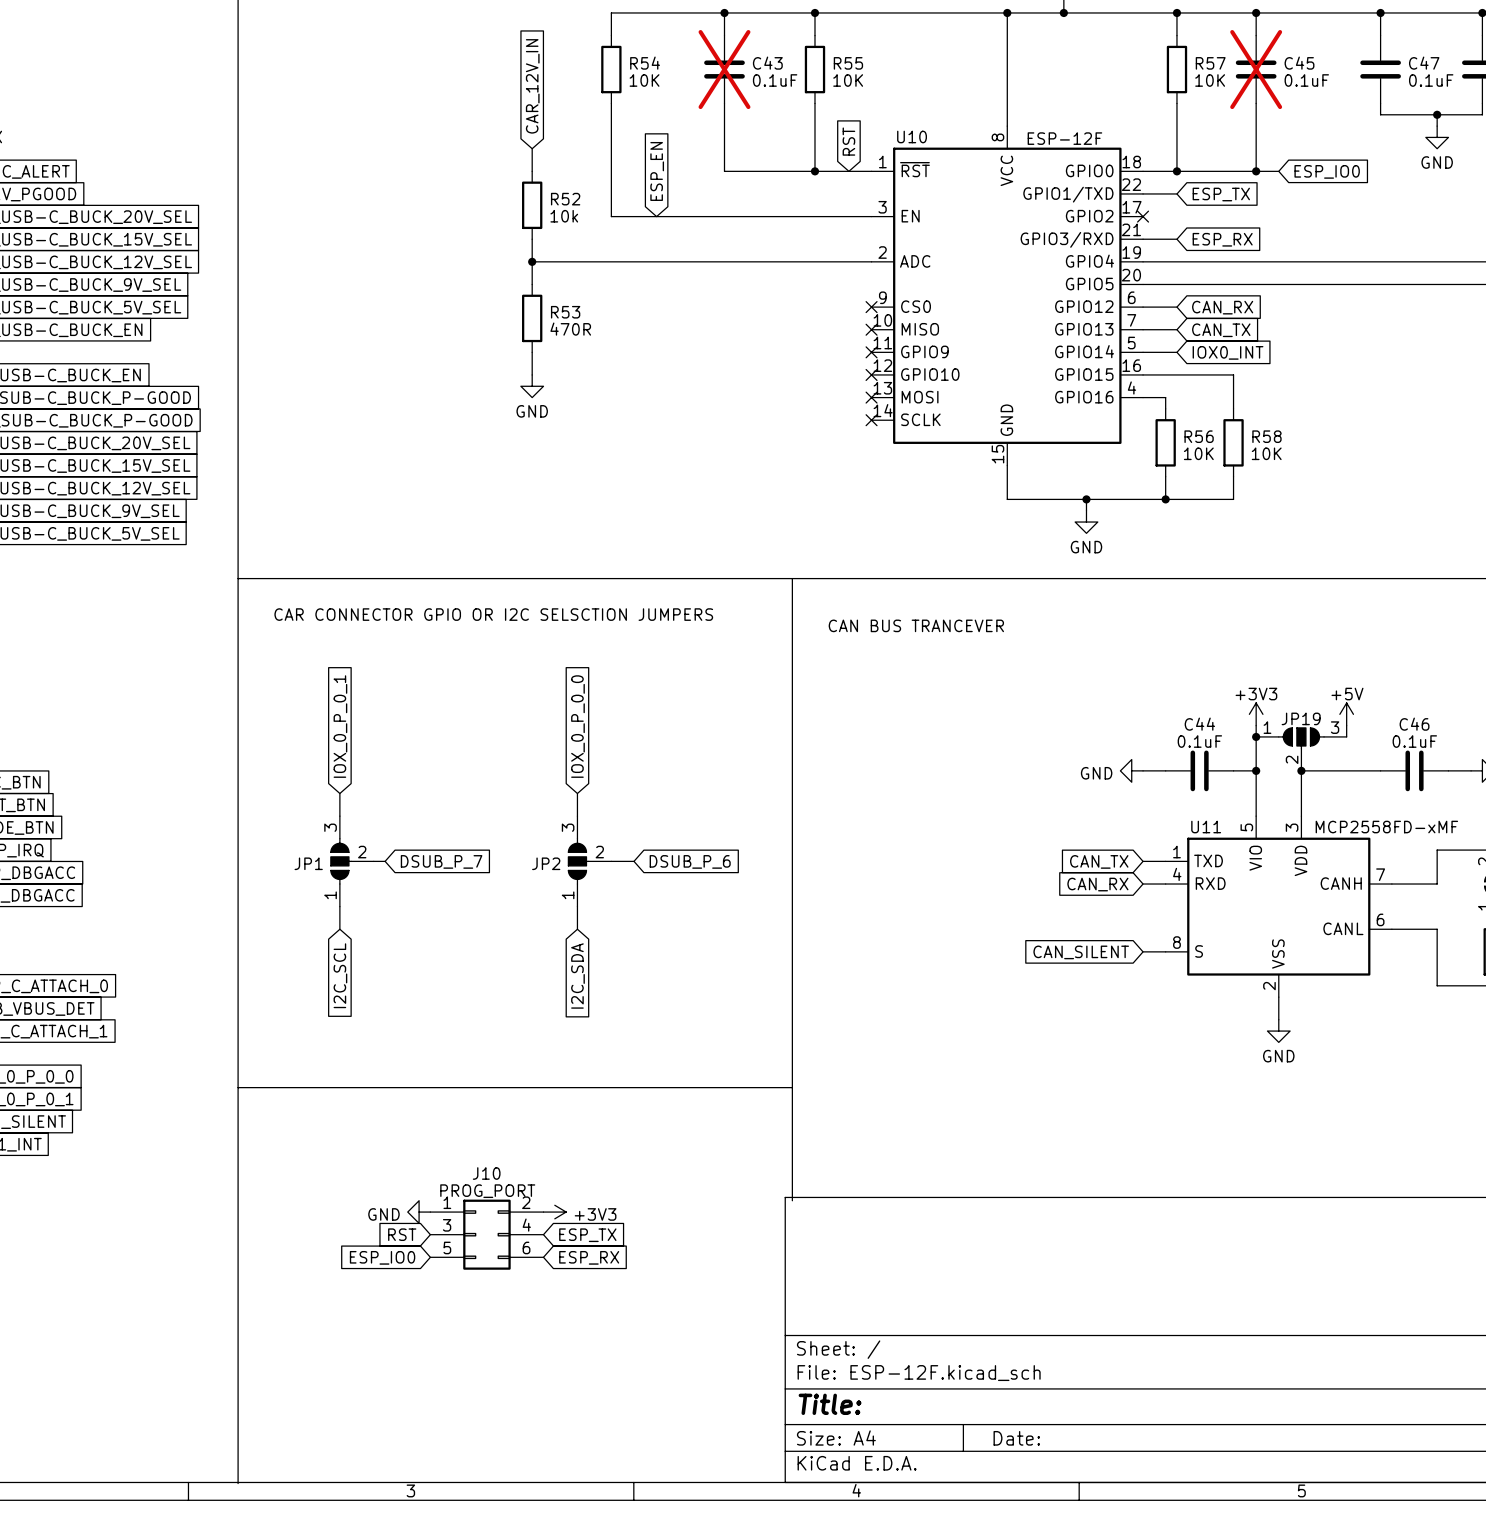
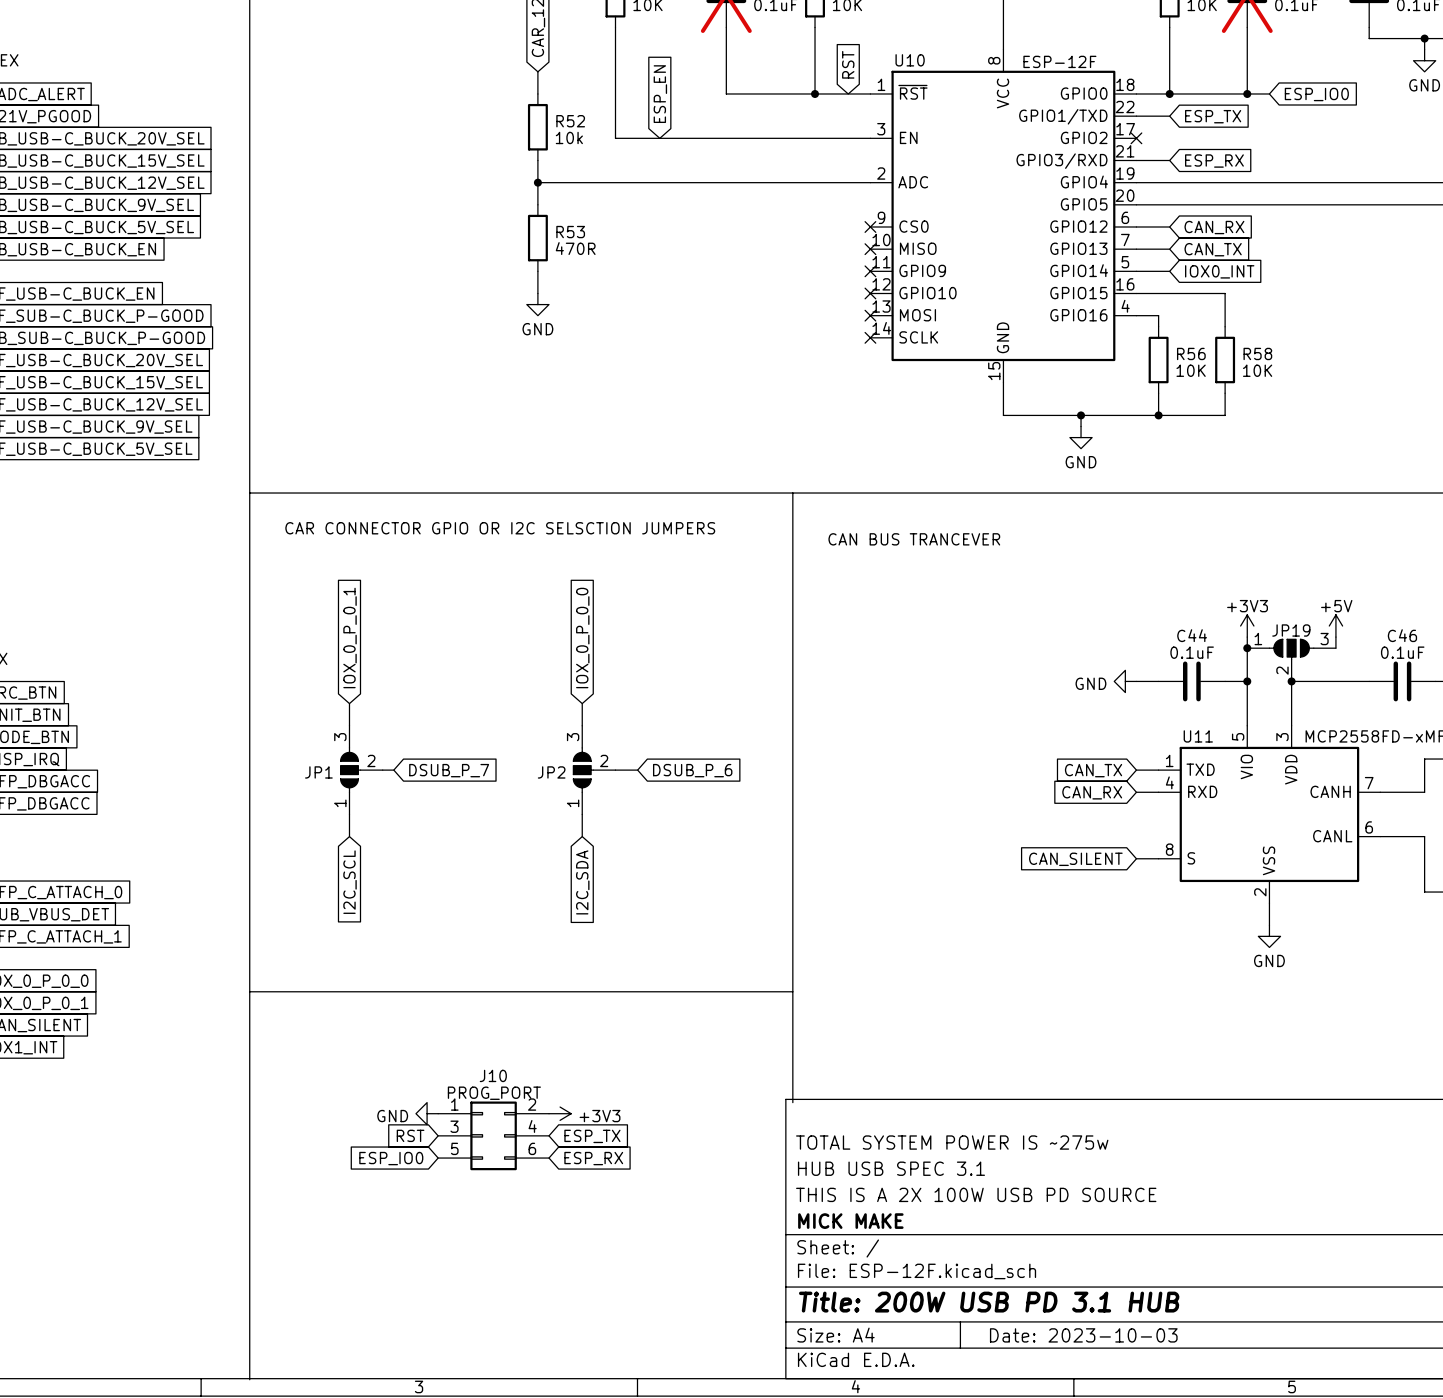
title block: none -> TOTAL SYSTEM POWER IS ~275w (952, 1142)
title block: none -> HUB USB SPEC 3.1 (891, 1168)
title block: none -> THIS IS A 2X 100W USB PD SOURCE (976, 1194)
title block: none -> MICK MAKE (850, 1221)
title block: Title: (830, 1404) -> Title: 200W USB PD 3.1 HUB (989, 1302)
title block: Date: (1016, 1438) -> Date: 2023-10-03 (1083, 1335)

